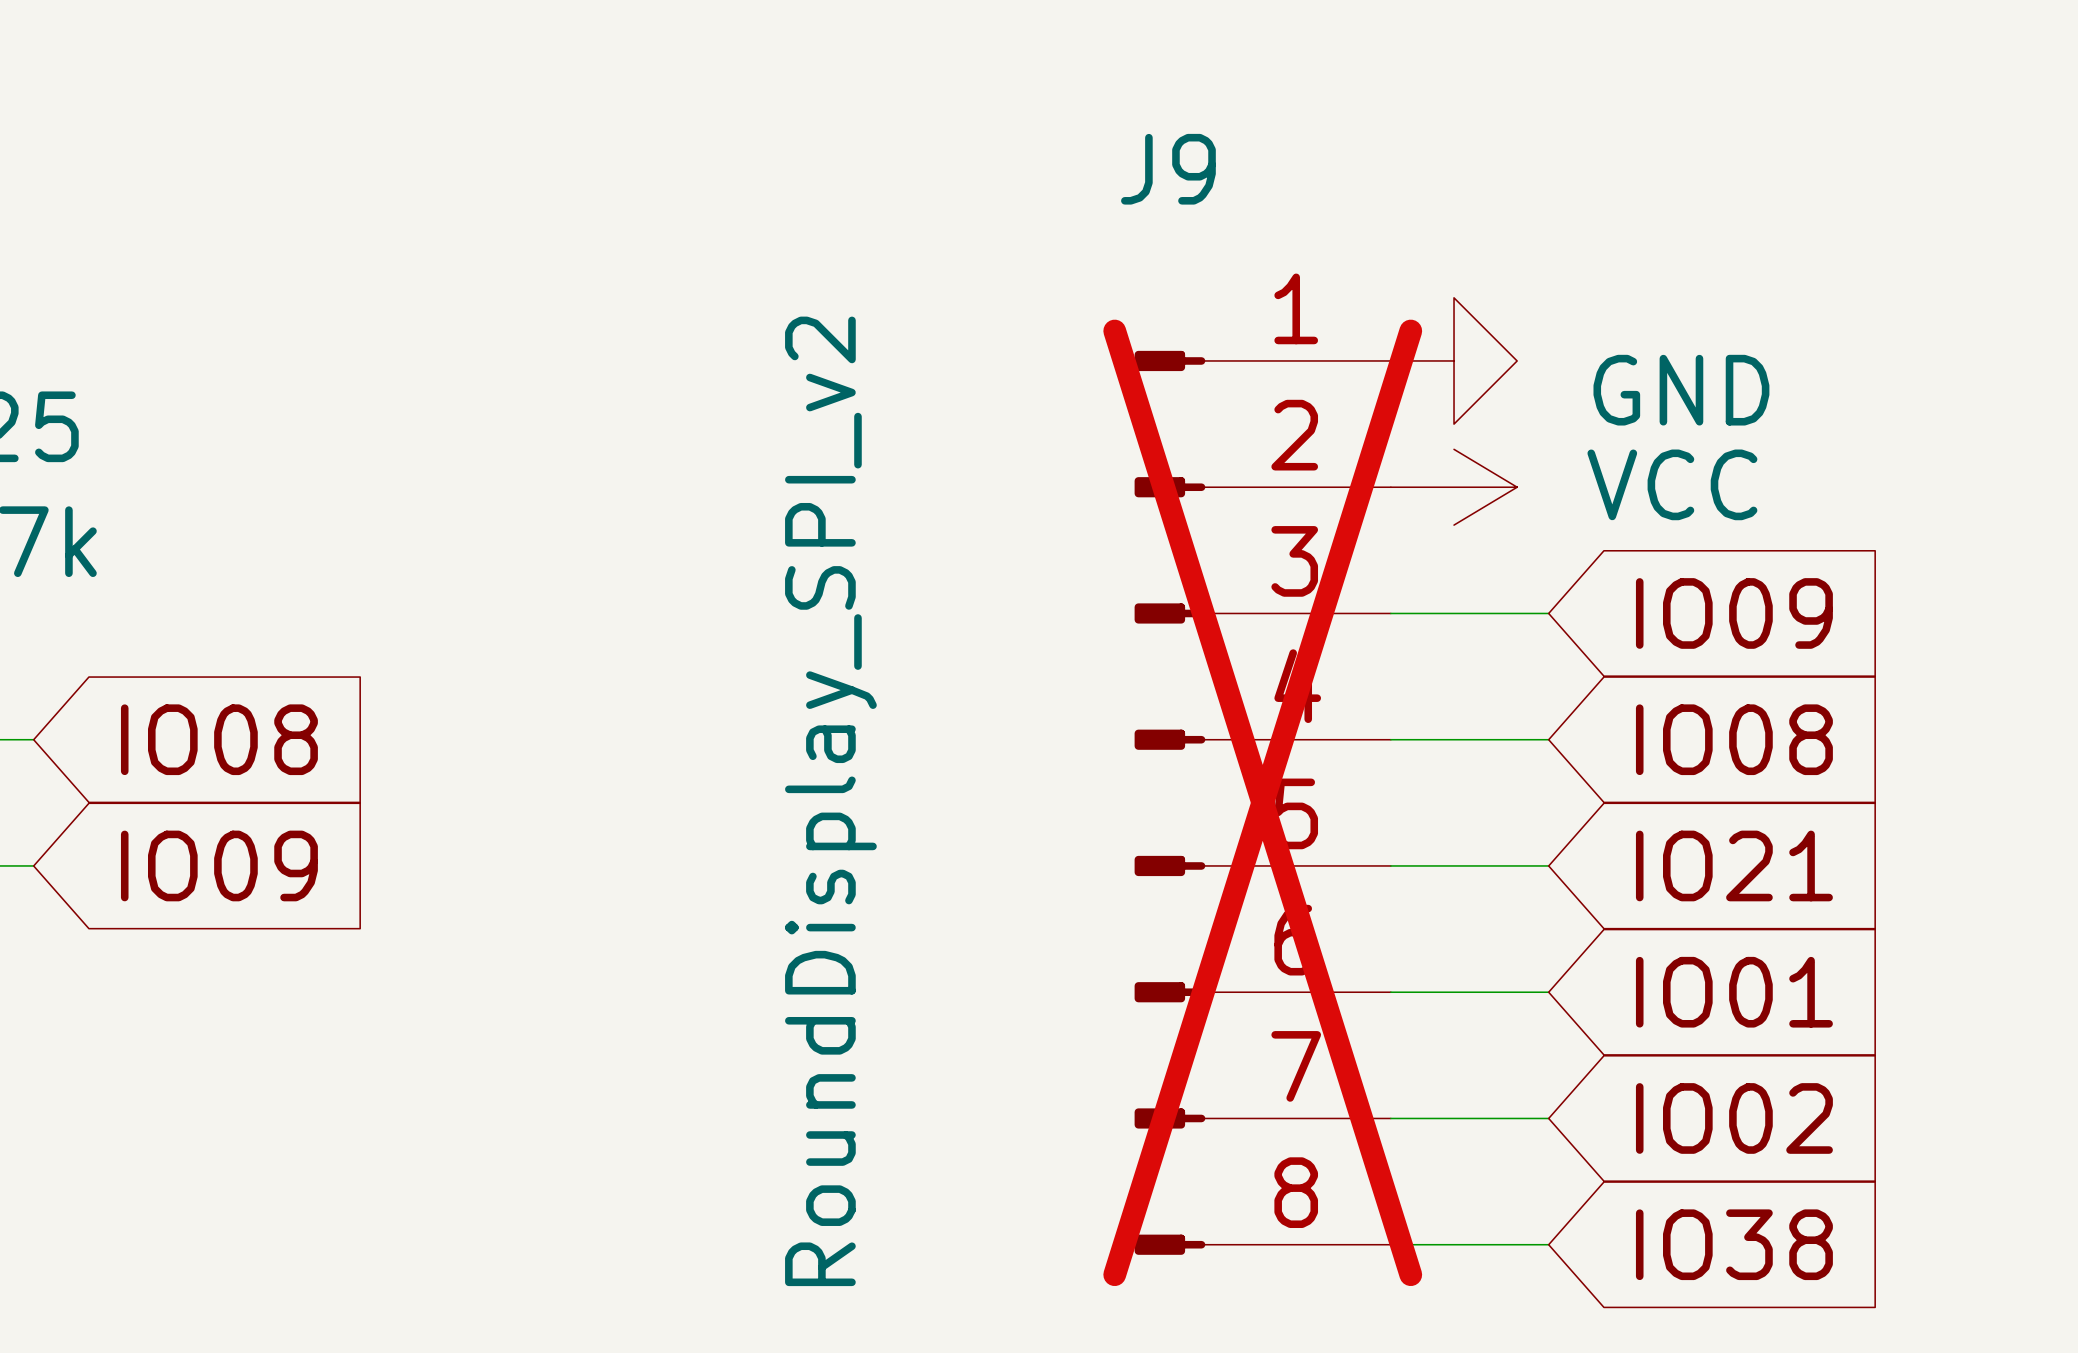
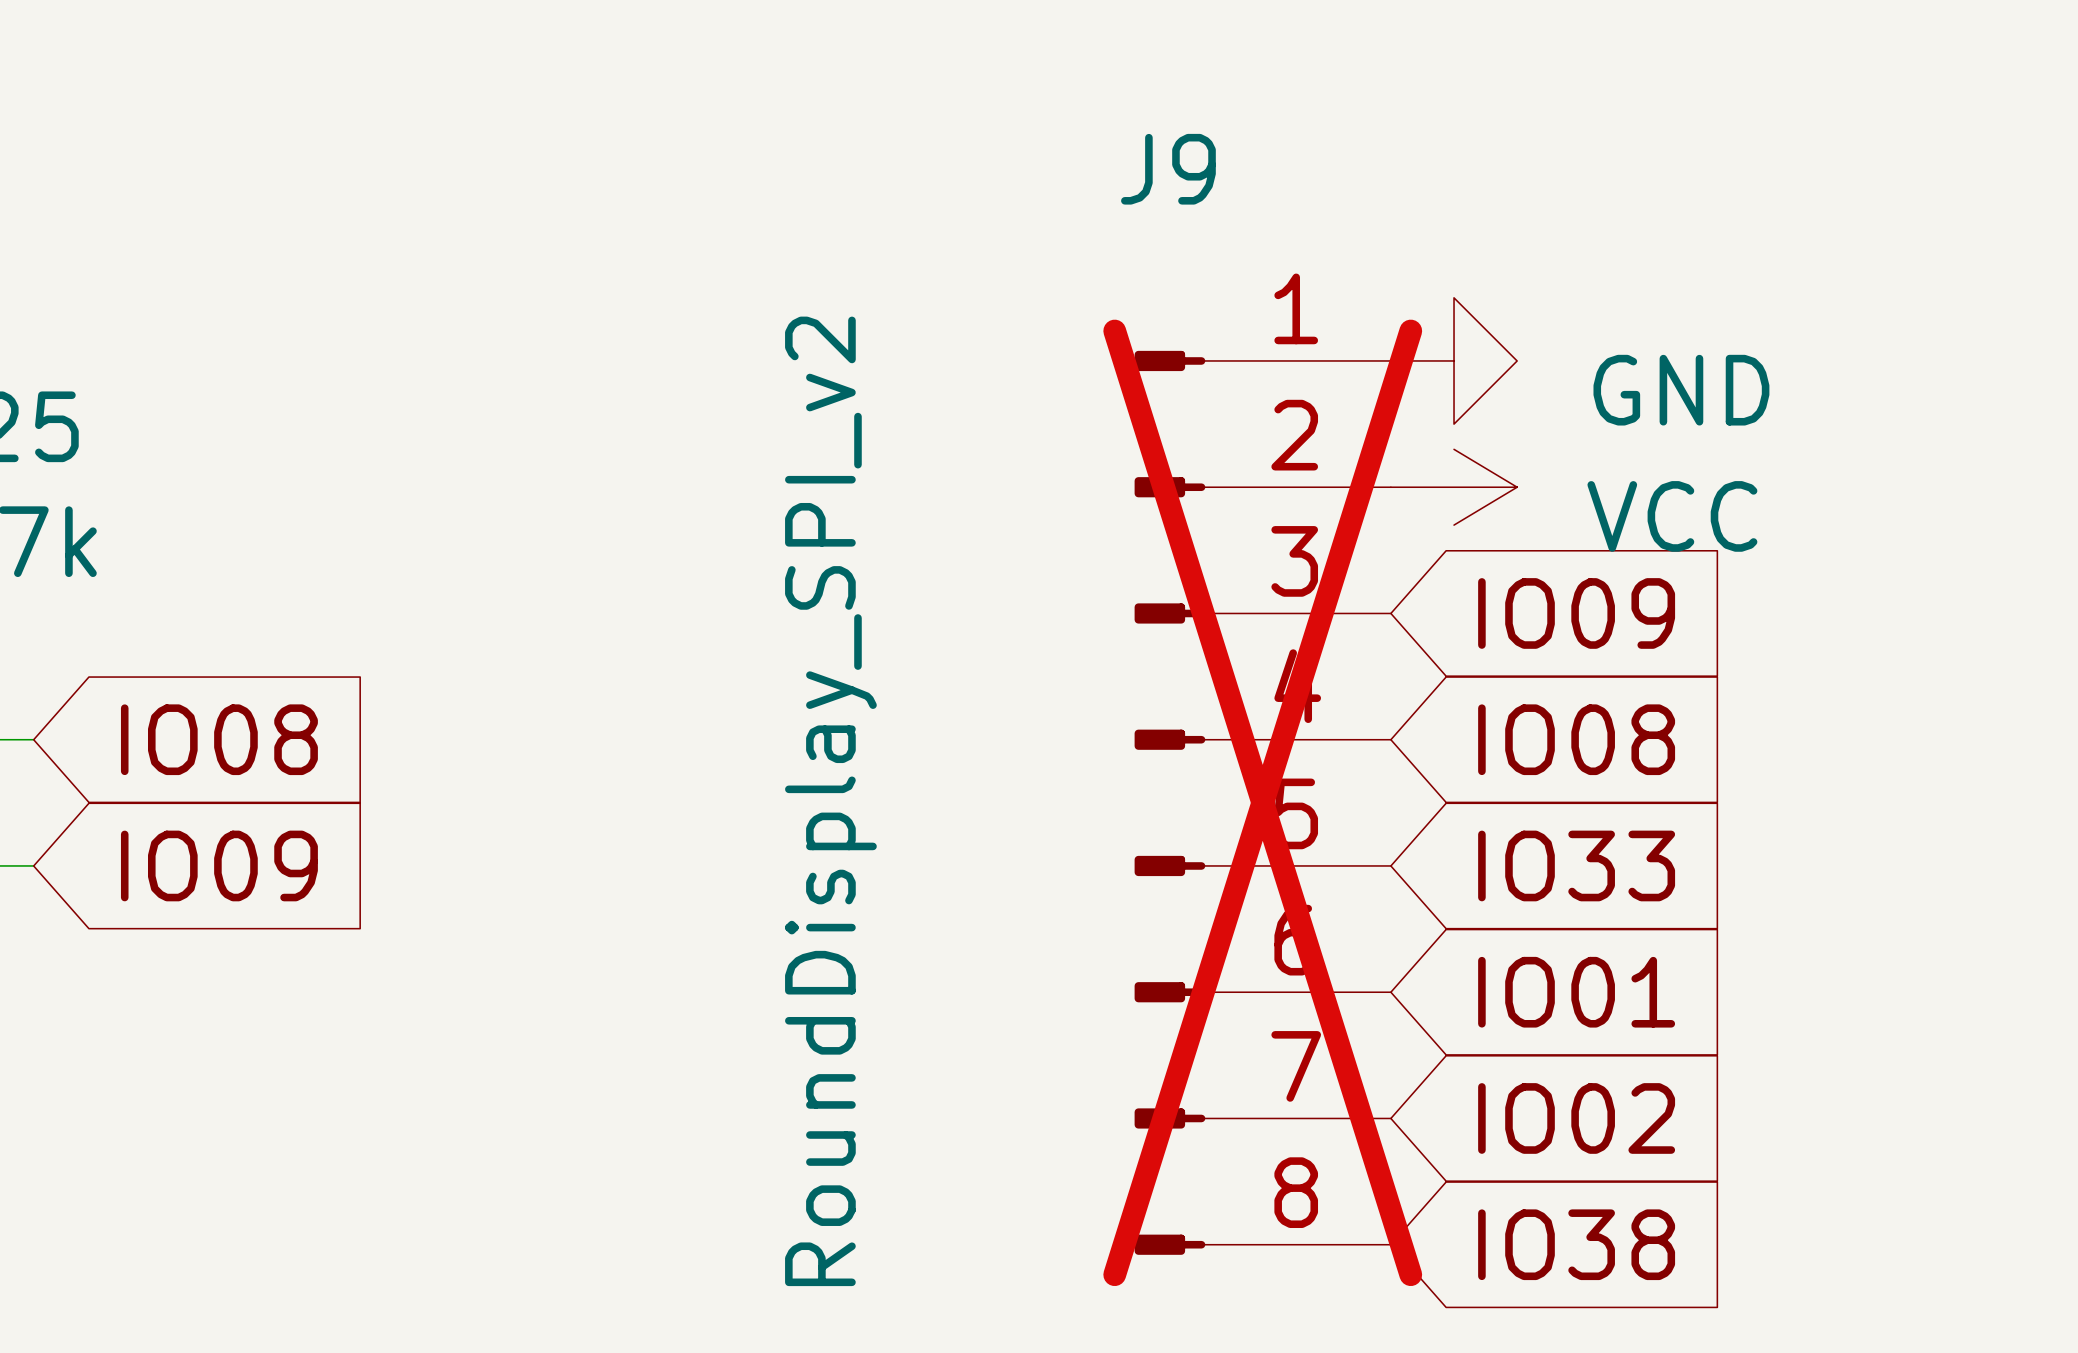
power symbol text position: VCC (1672, 484) -> VCC (1672, 516)
wire: (1390, 613) (1548, 613) -> none
global label position: IO09 (1734, 613) -> IO09 (1576, 613)
wire: (1390, 739) (1548, 739) -> none
global label position: IO08 (1734, 739) -> IO08 (1576, 739)
wire: (1390, 865) (1548, 865) -> none
global label: none -> IO33 (1576, 865)
global label: IO21 (1734, 865) -> none
wire: (1390, 992) (1548, 992) -> none
global label position: IO01 (1734, 992) -> IO01 (1576, 992)
wire: (1390, 1118) (1548, 1118) -> none
global label position: IO02 (1734, 1118) -> IO02 (1576, 1118)
wire: (1390, 1244) (1548, 1244) -> none
global label position: IO38 (1734, 1244) -> IO38 (1576, 1244)

